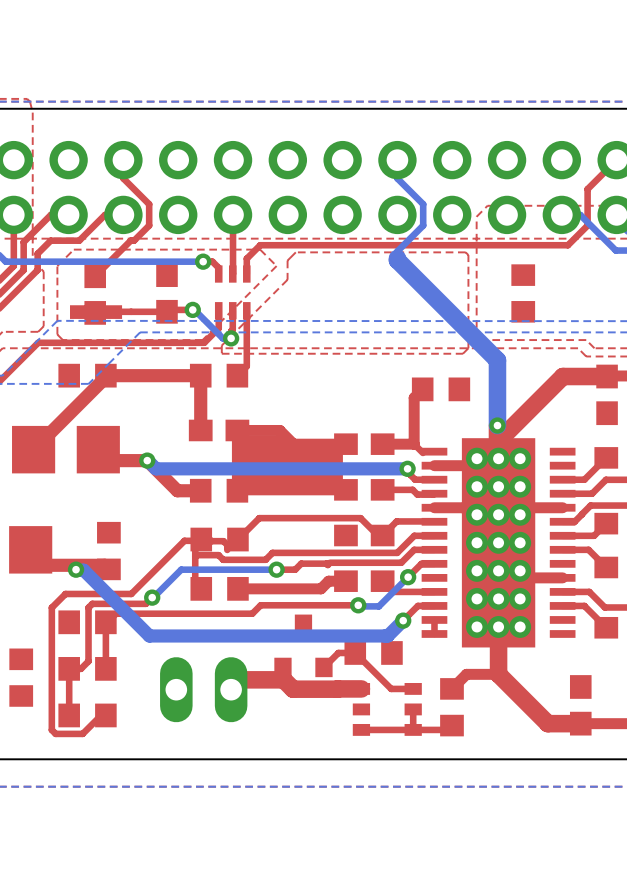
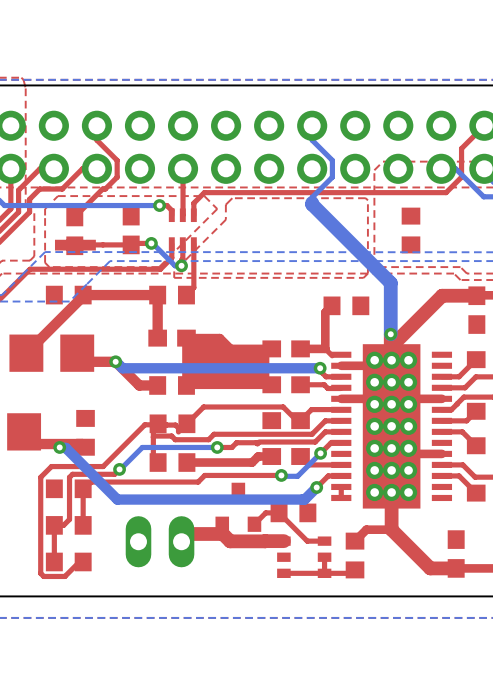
part: (21, 677) -> none

